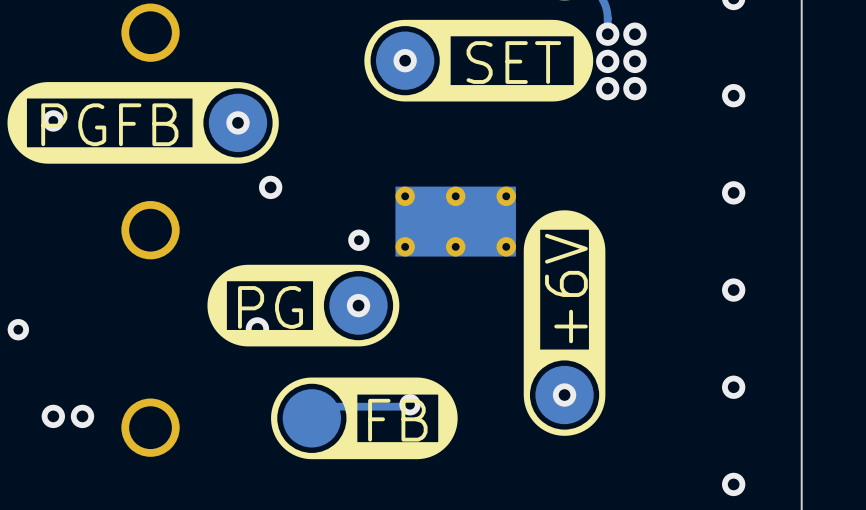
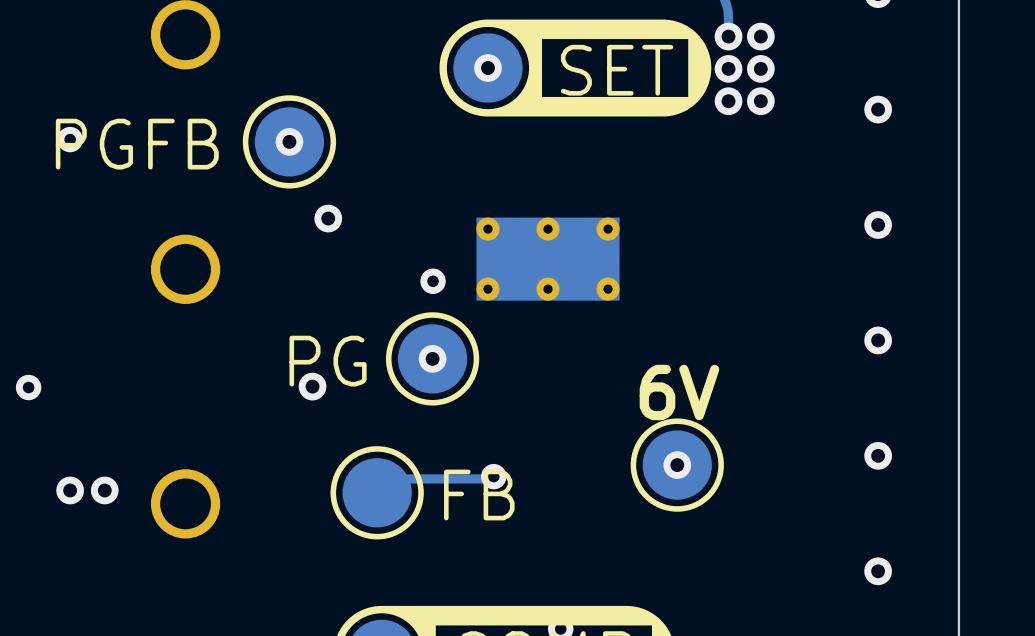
drawing: [7, 82, 279, 164] -> none
drawing: [523, 210, 606, 436] -> none
drawing: [207, 264, 458, 460] -> none
text: +6V (566, 288) -> 6V (679, 392)

